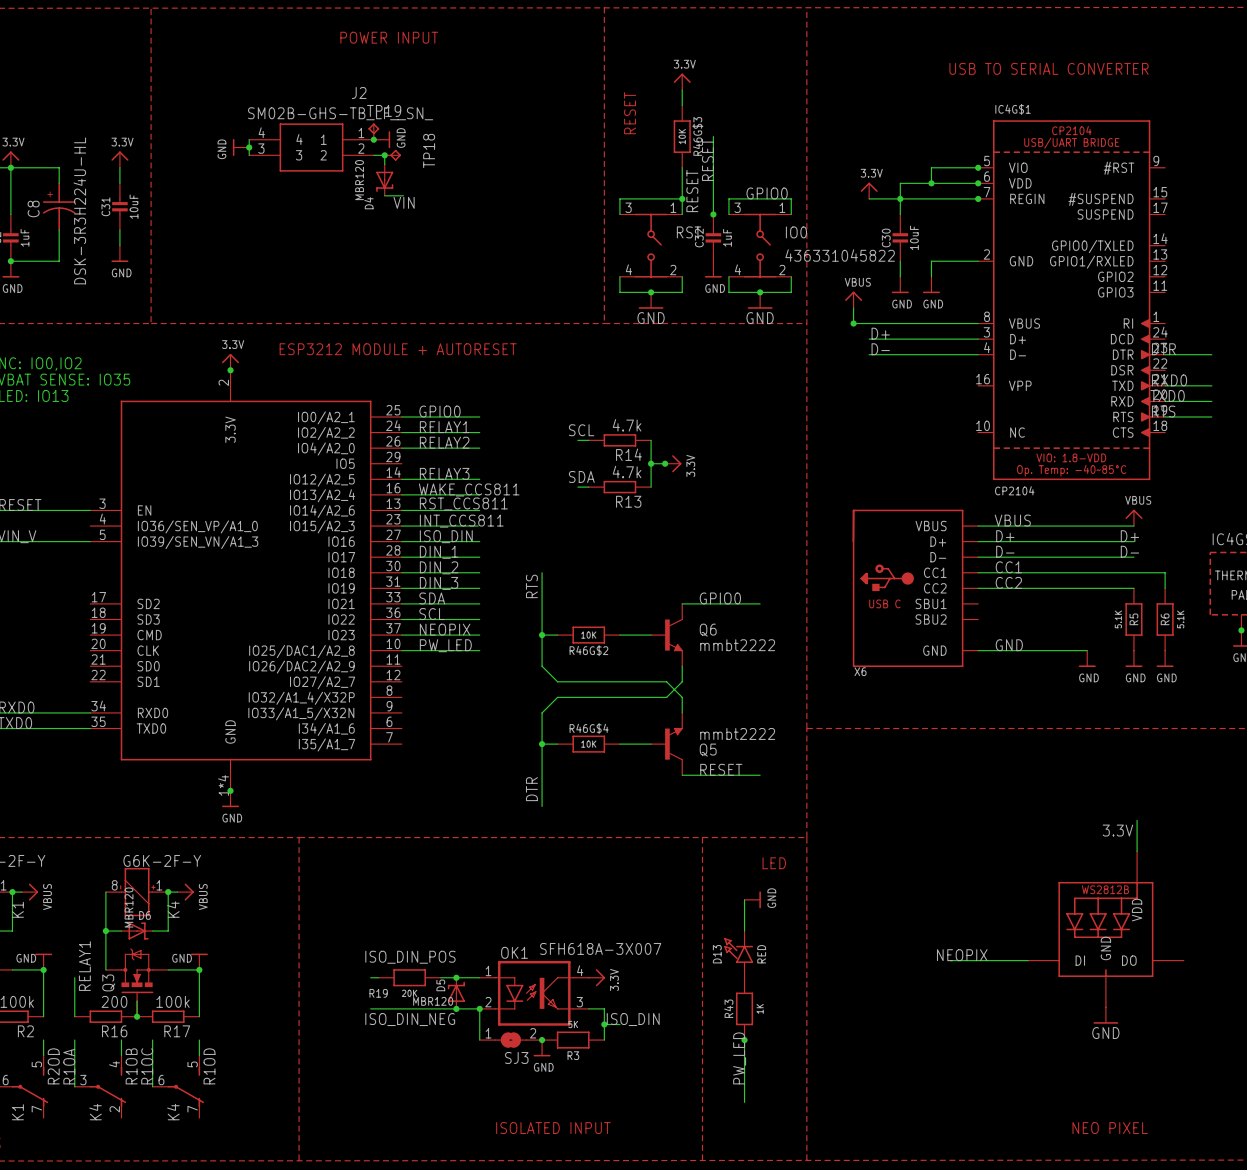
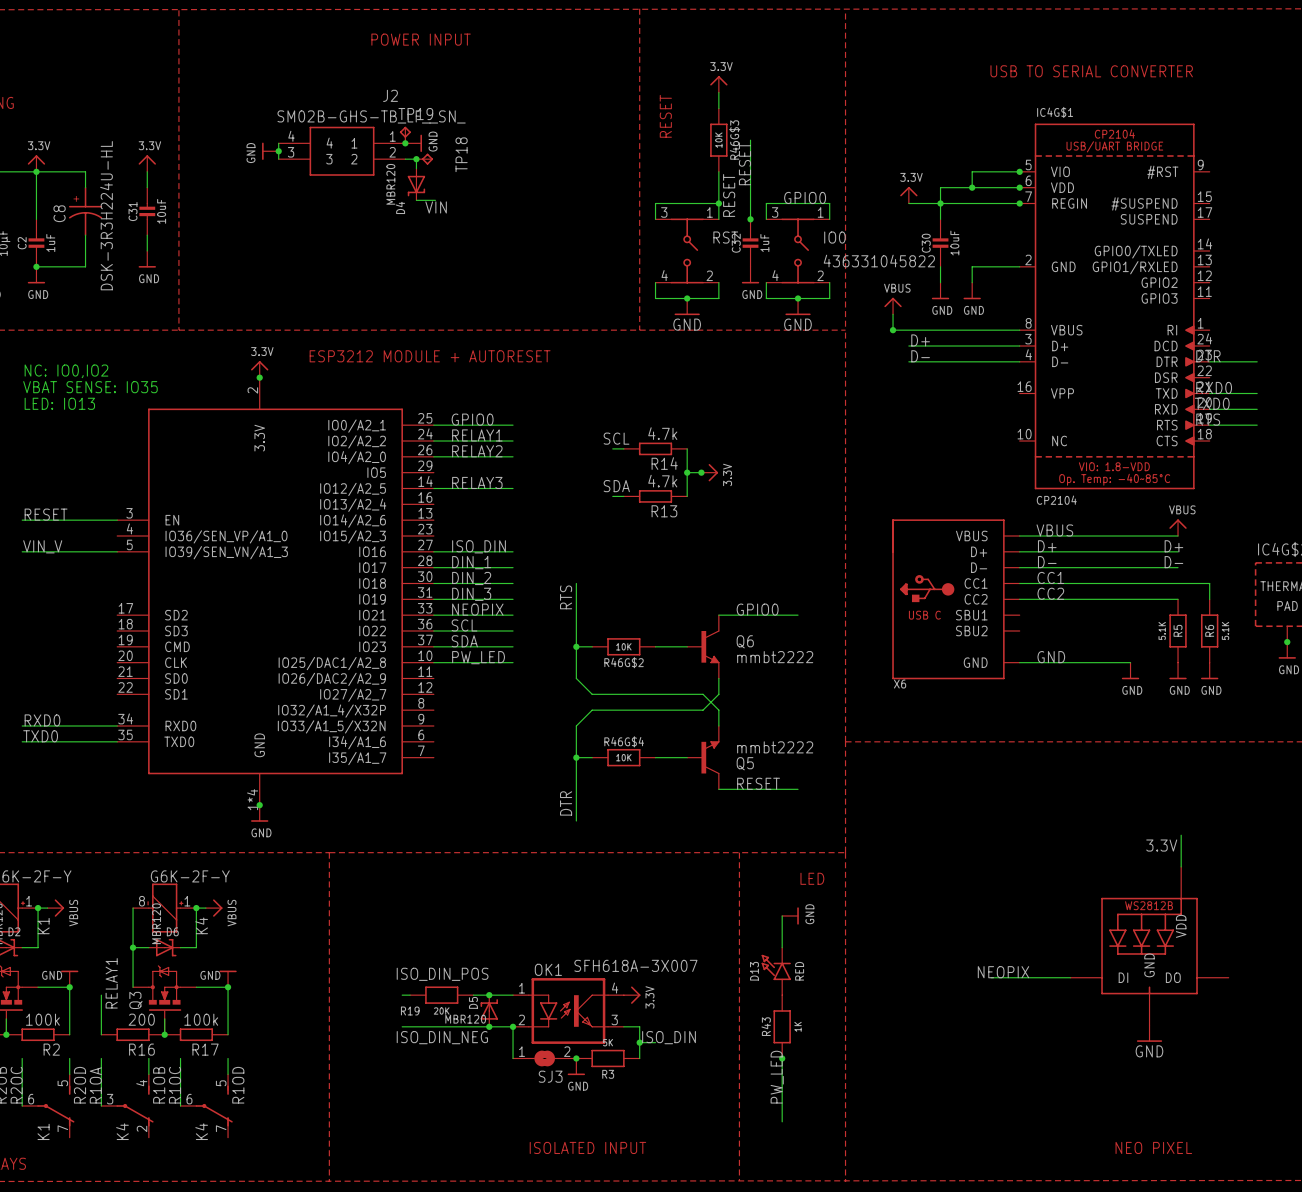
label: WAKE_CCS811 (469, 489) -> none
wire: (401, 494) (479, 494) -> none
label: RST_CCS811 (463, 503) -> none
wire: (401, 510) (479, 510) -> none
label: INT_CCS811 (461, 521) -> none
wire: (401, 526) (478, 526) -> none
label: SDA (432, 598) -> NEOPIX (477, 609)
label: NEOPIX (445, 629) -> SDA (464, 641)

